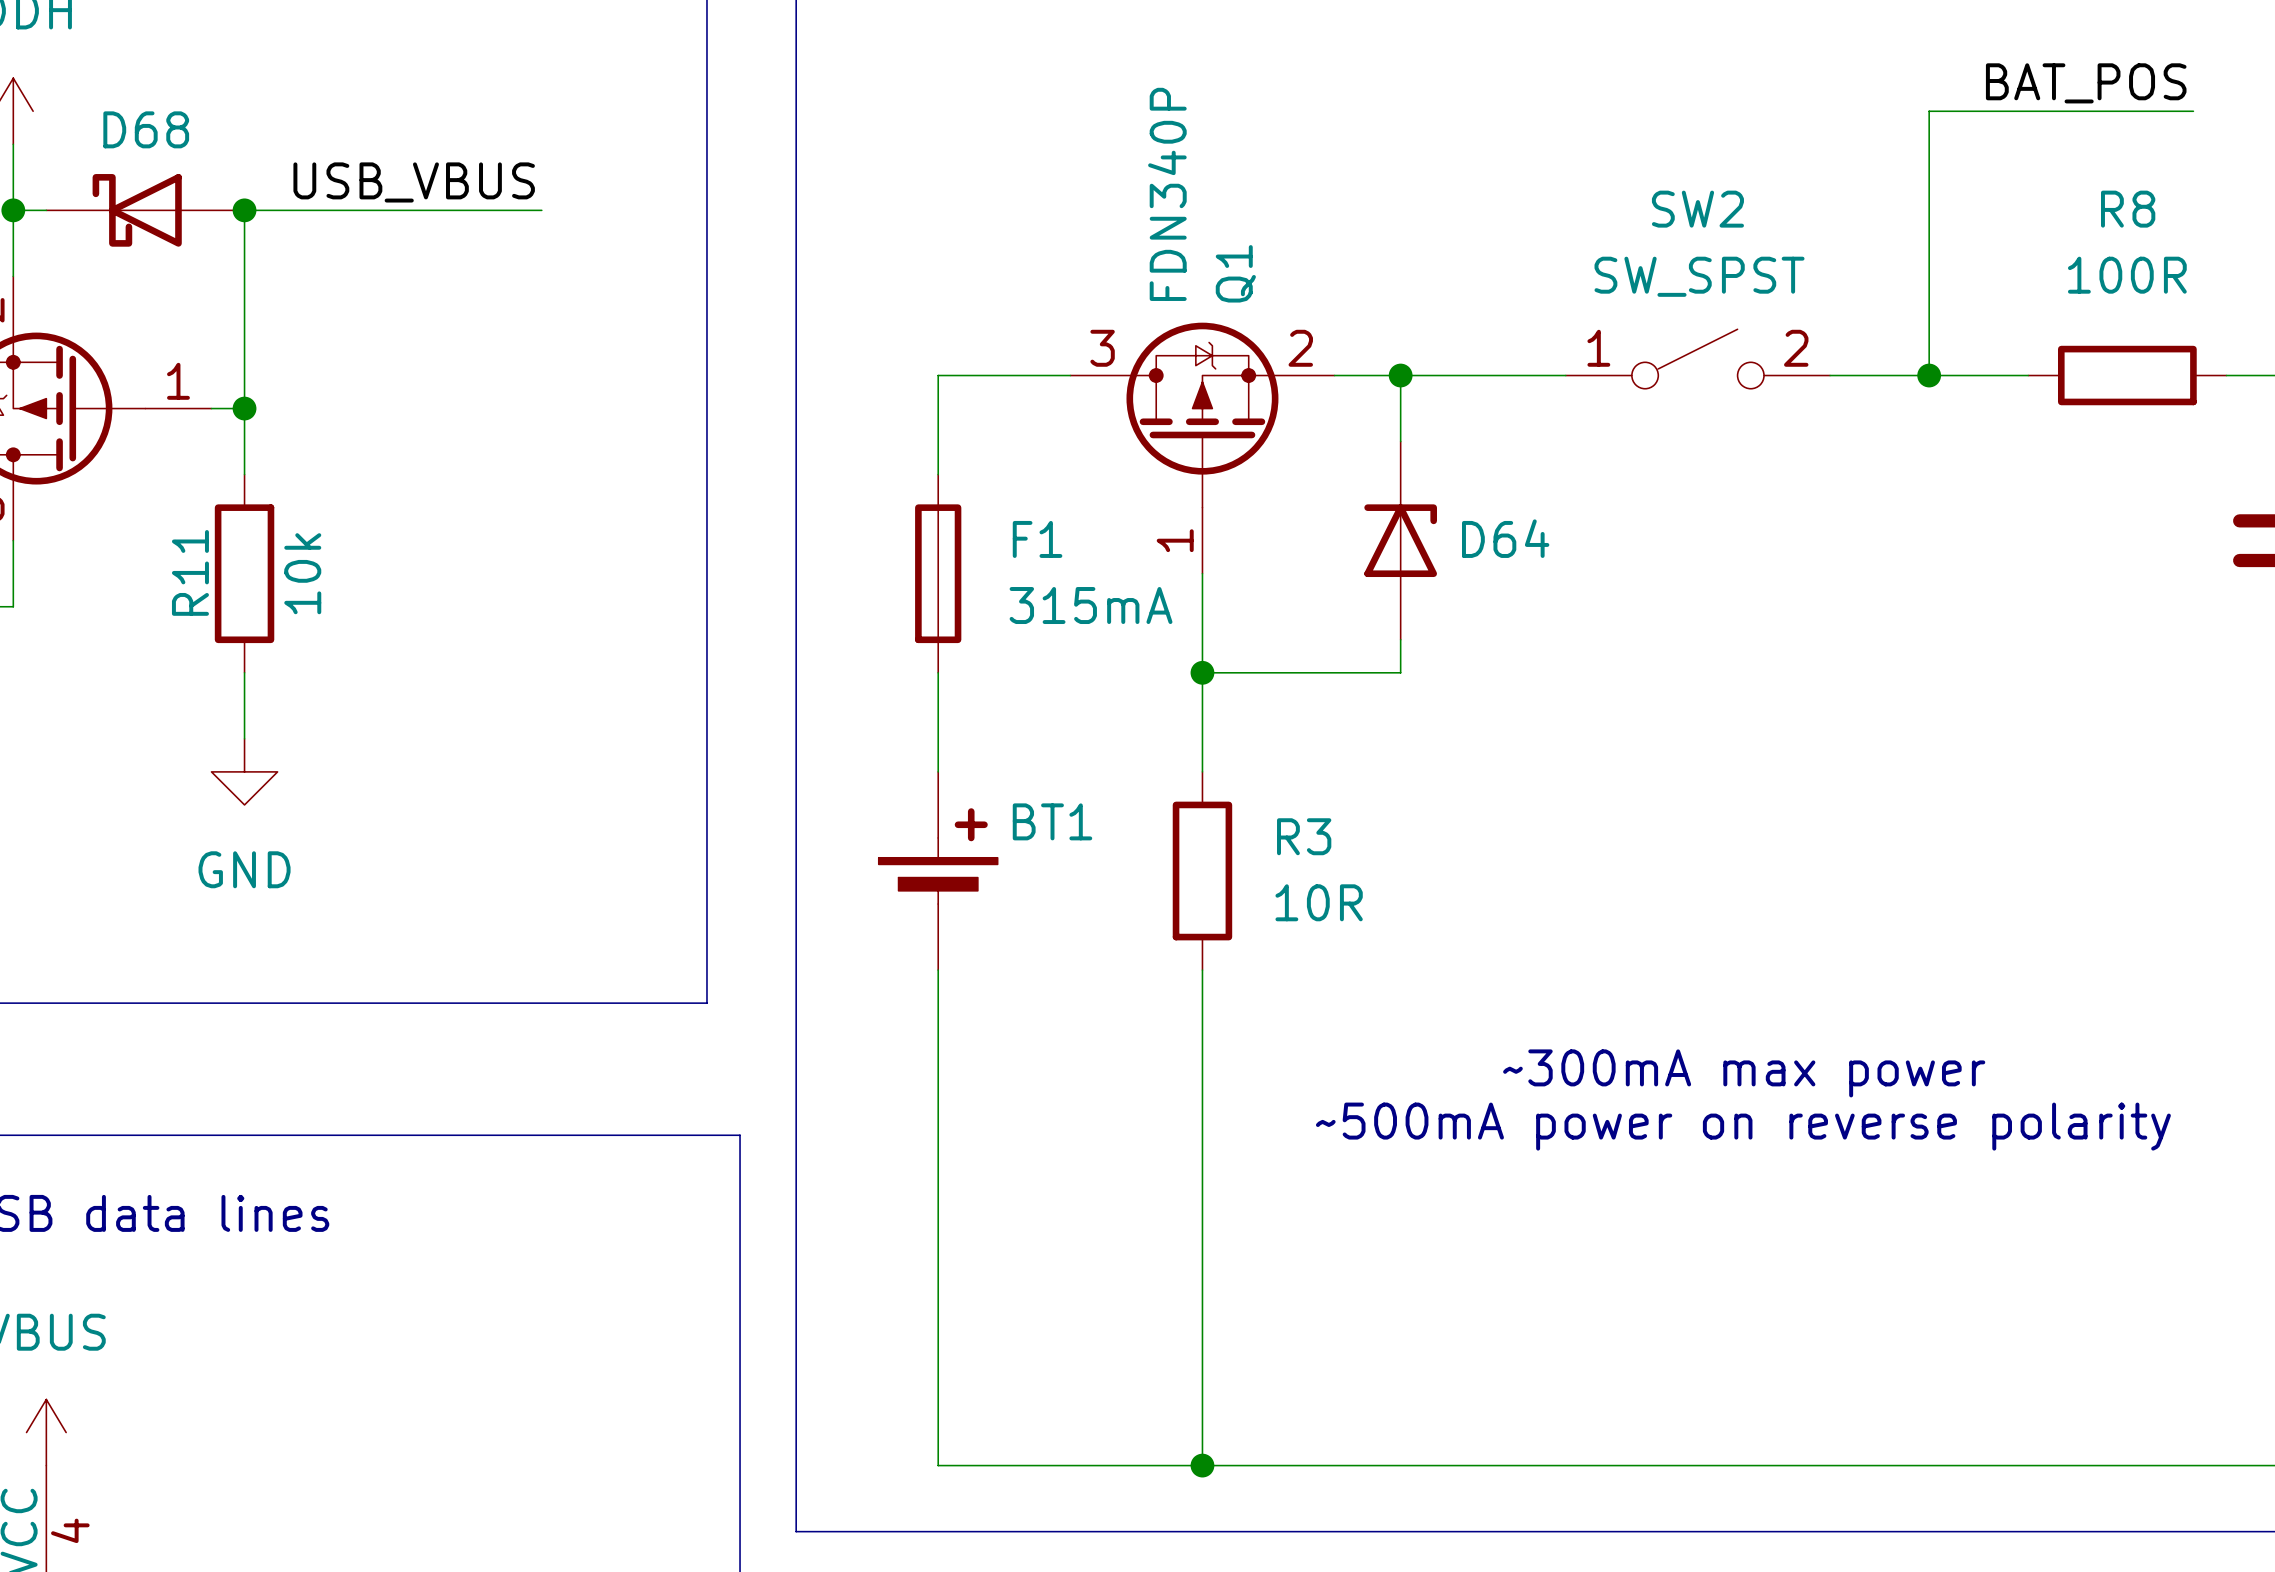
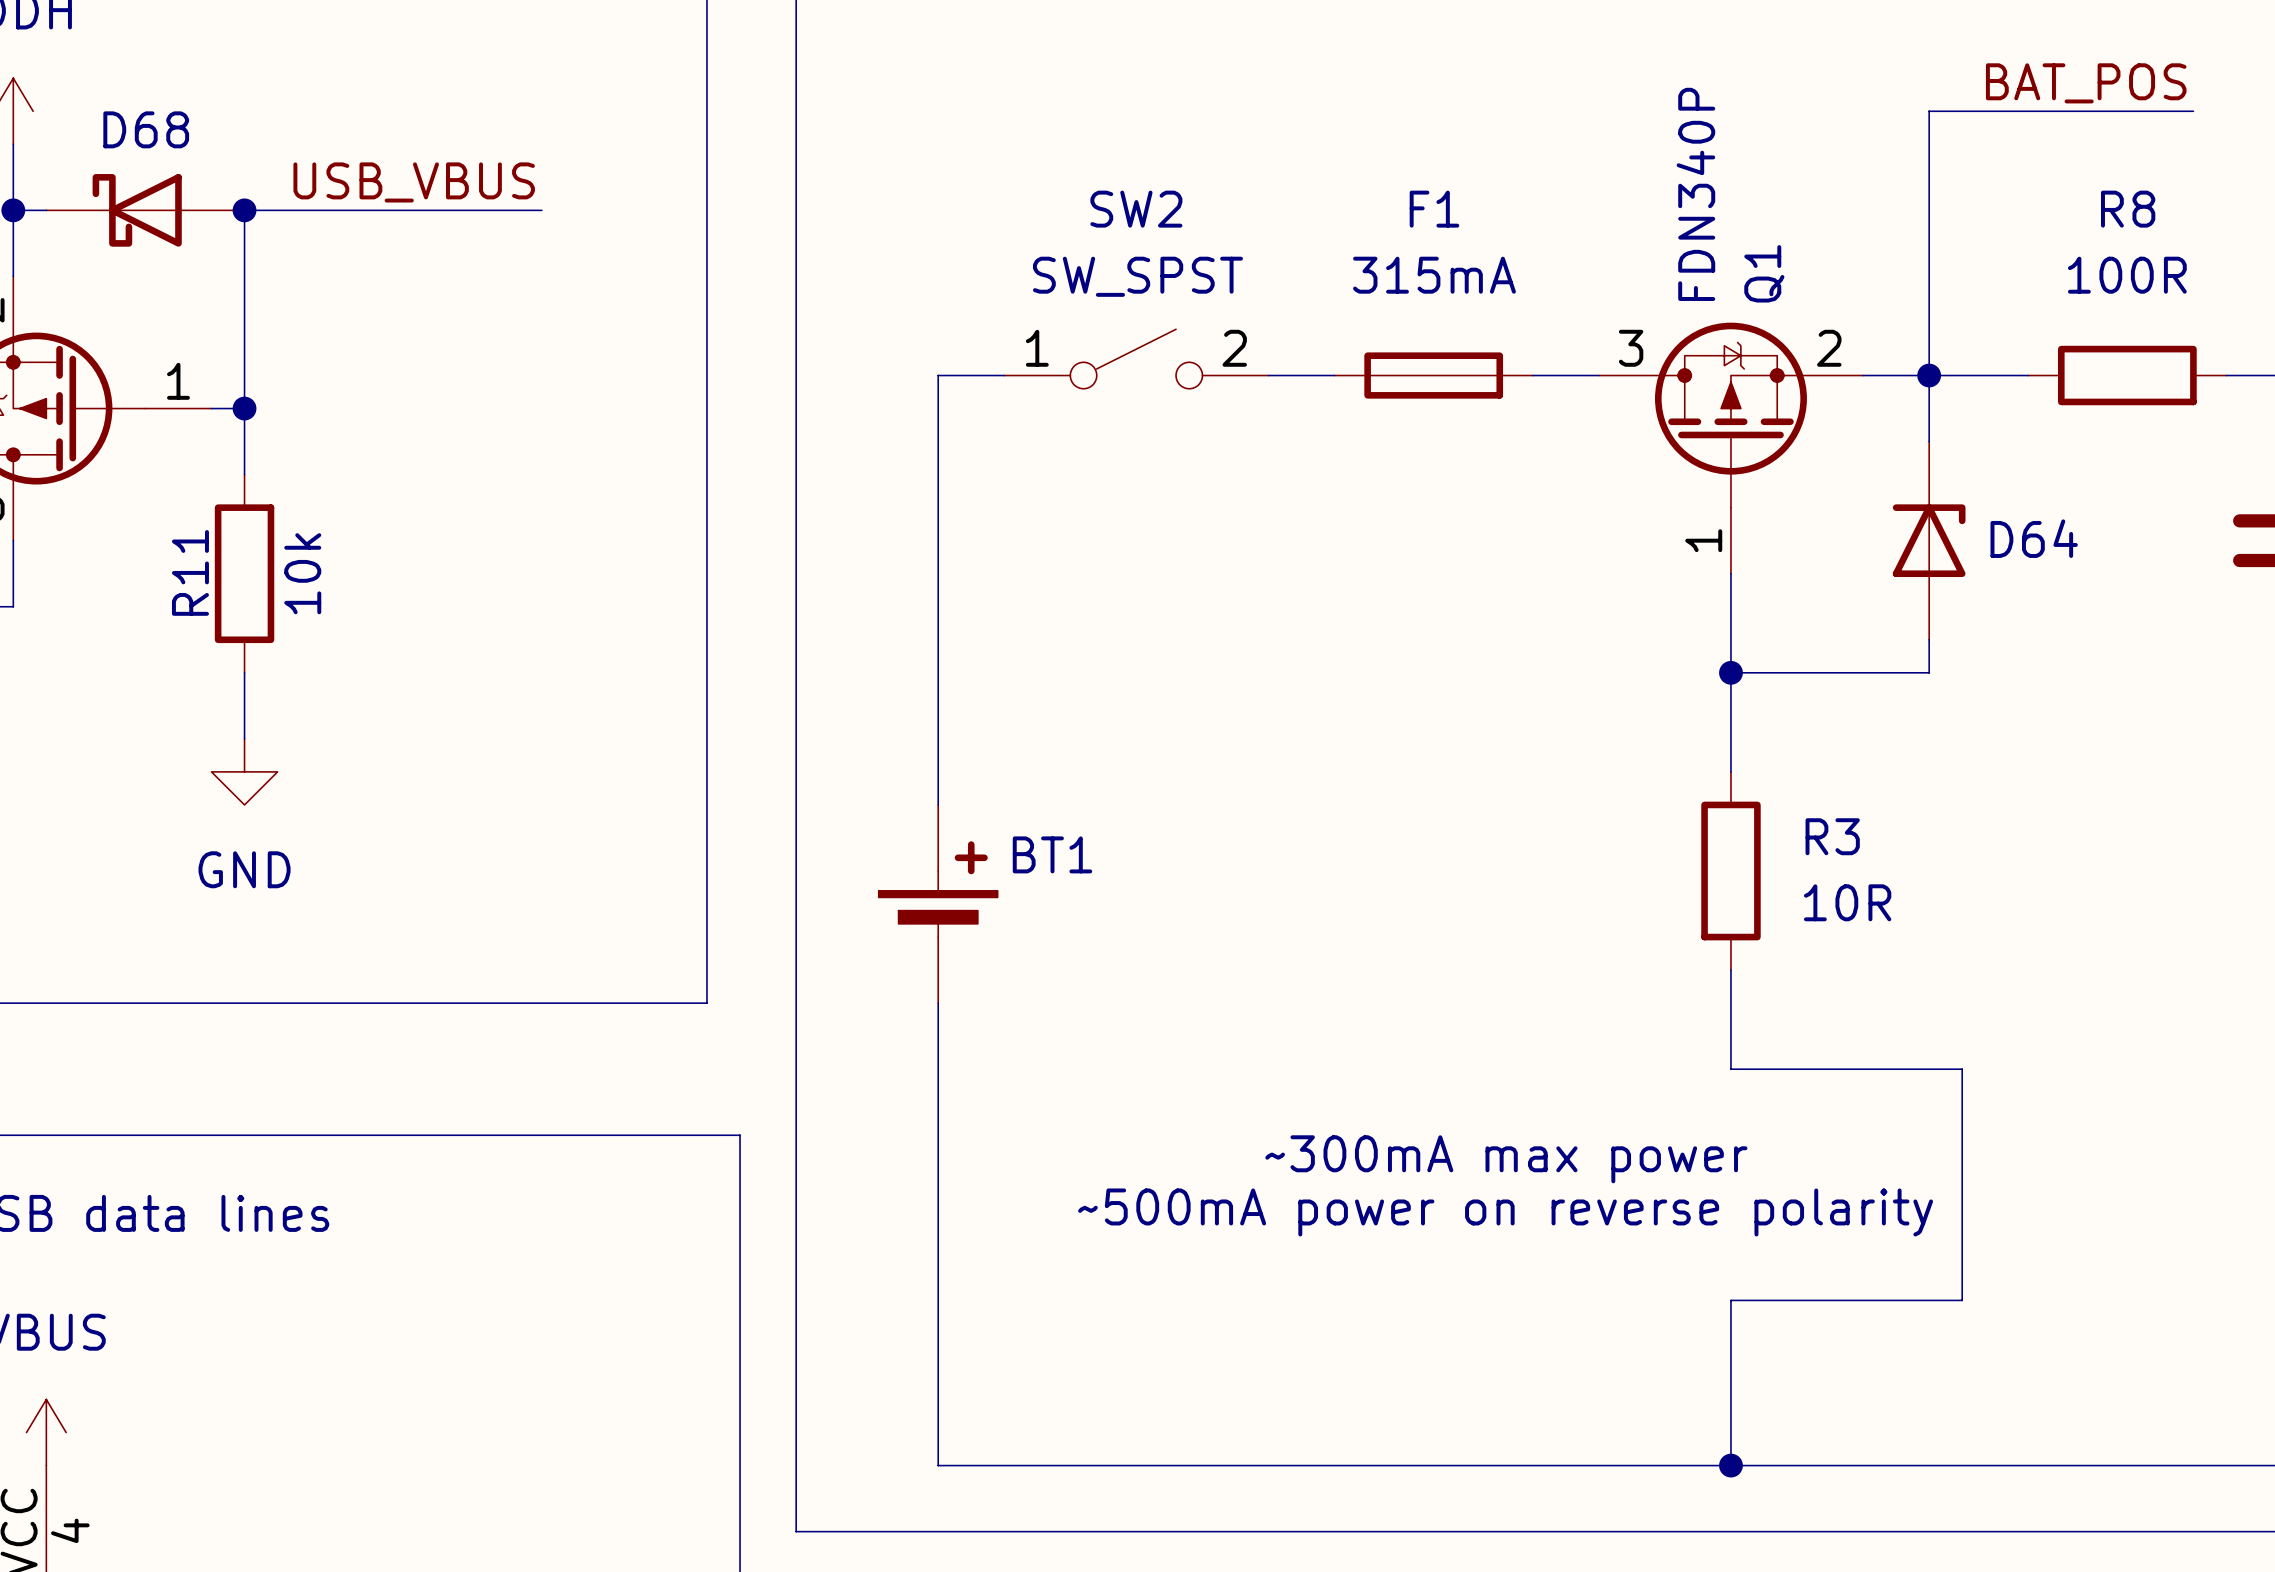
SW2 position: (1697, 359) -> (1136, 359)
wire: (1400, 375) (1400, 441) -> (1929, 375) (1929, 441)
junction: (1400, 375) -> none
Q1 position: (1202, 448) -> (1730, 448)
F1 name position: F1 (1037, 539) -> F1 (1434, 209)
D64 position: (1400, 540) -> (1929, 540)
F1 rotation: 0° (938, 573) -> 90° clockwise (1433, 375)
F1 position: (938, 573) -> (1433, 375)
wire: (1202, 573) (1202, 771) -> (1730, 573) (1730, 771)
F1 value position: 315mA (1091, 605) -> 315mA (1434, 275)
wire: (1400, 639) (1400, 672) (1202, 672) -> (1929, 639) (1929, 672) (1730, 672)
junction: (1202, 672) -> none
junction: none -> (1730, 672)
BT1 position: (938, 871) -> (938, 904)
R3 position: (1202, 871) -> (1730, 871)
wire: (1202, 970) (1202, 1465) -> none
wire: none -> (1730, 970) (1730, 1069) (1962, 1069) (1962, 1300) (1730, 1300) (1730, 1465)
text position: ~300mA max power (1744, 1073) -> ~300mA max power (1506, 1159)
text position: ~500mA power on reverse polarity (1743, 1126) -> ~500mA power on reverse polarity (1505, 1212)
junction: (1202, 1465) -> none
junction: none -> (1730, 1465)

